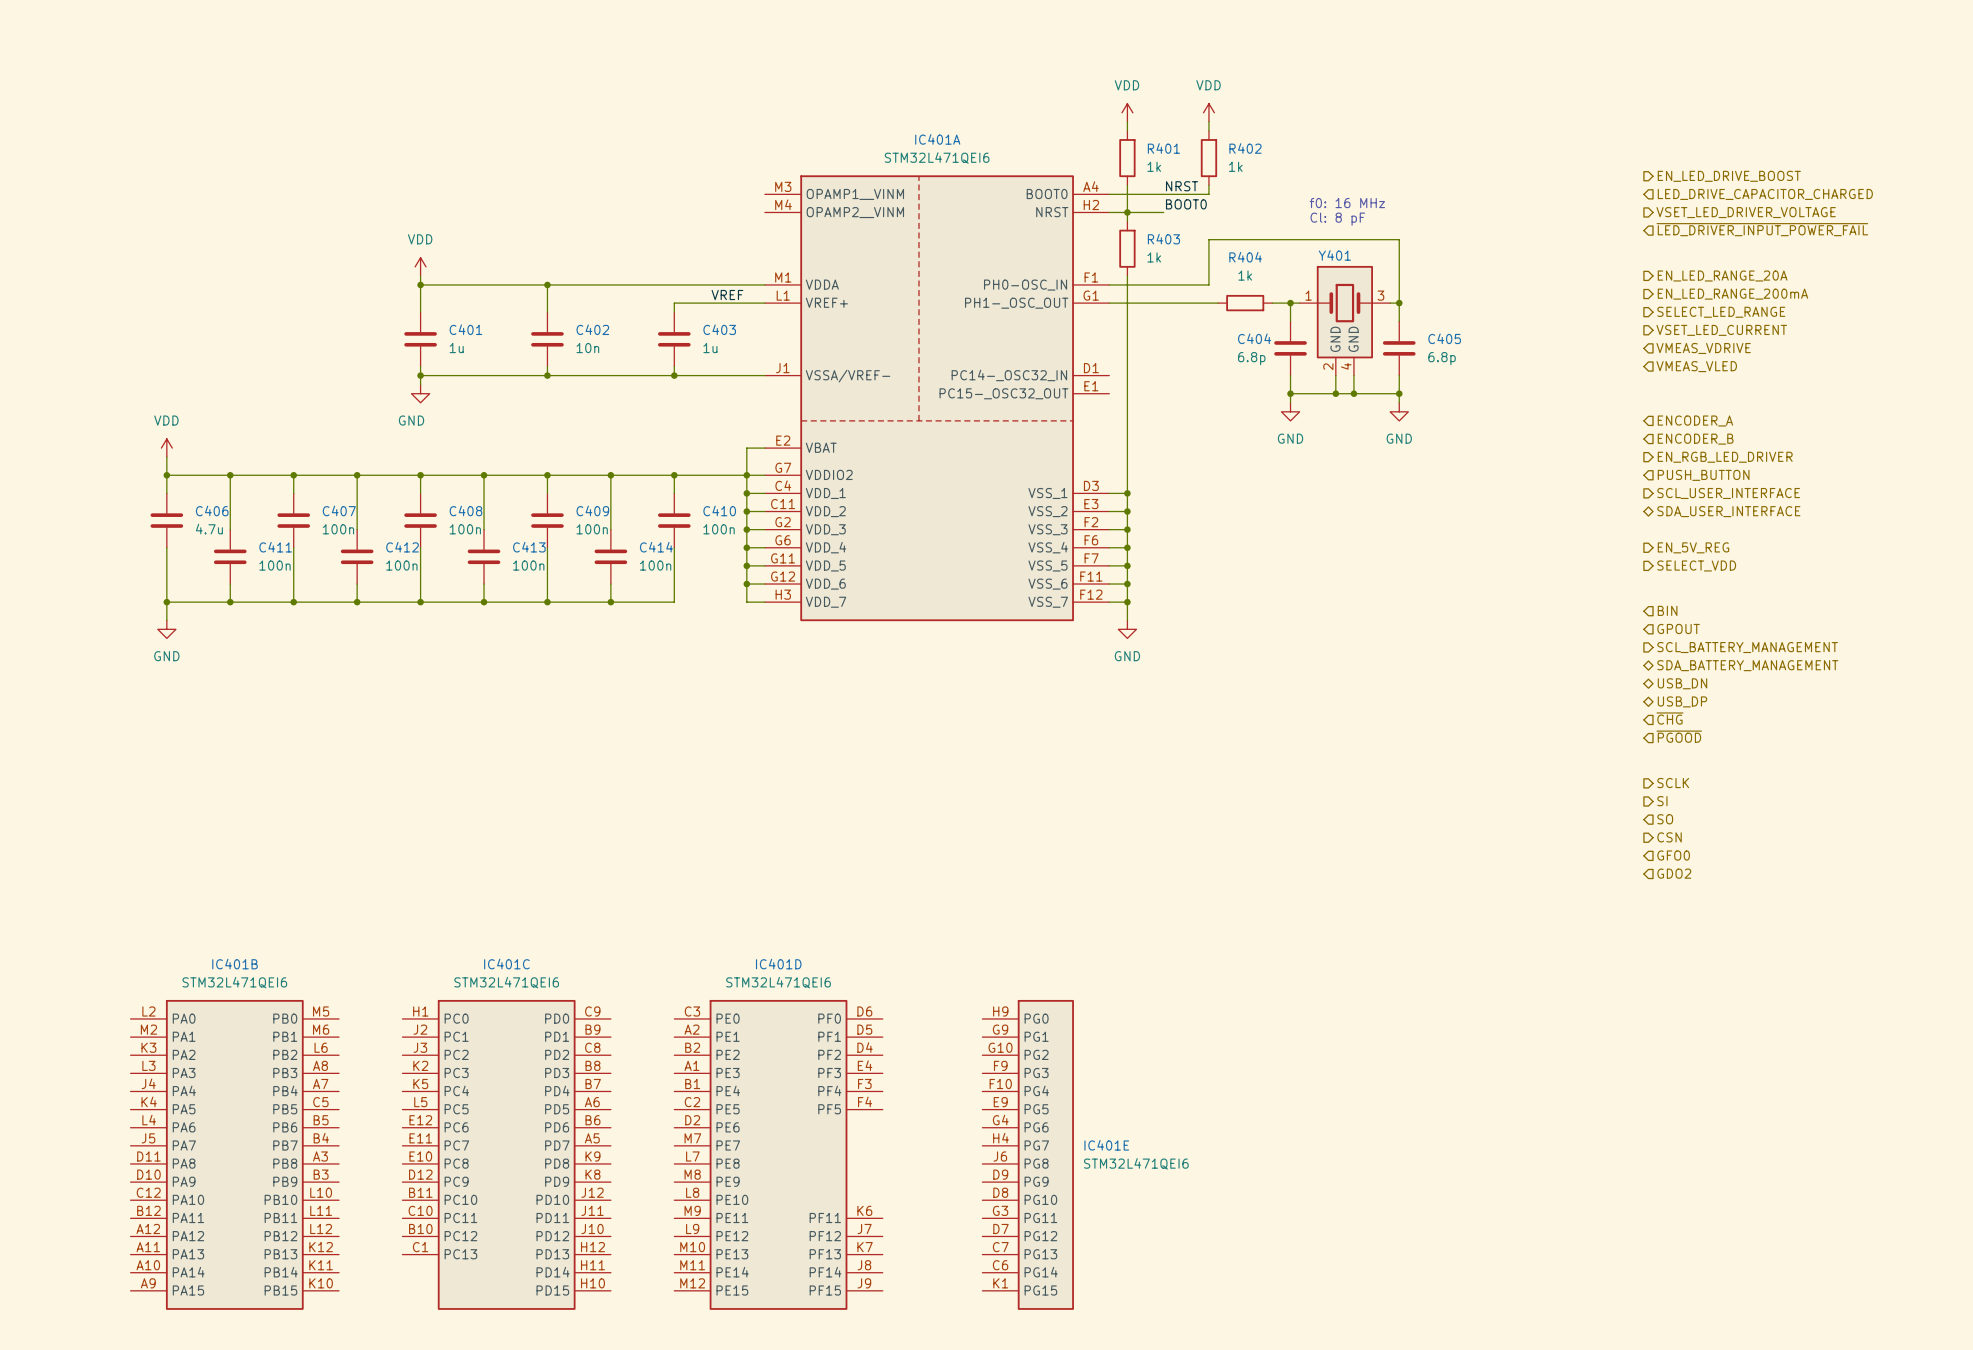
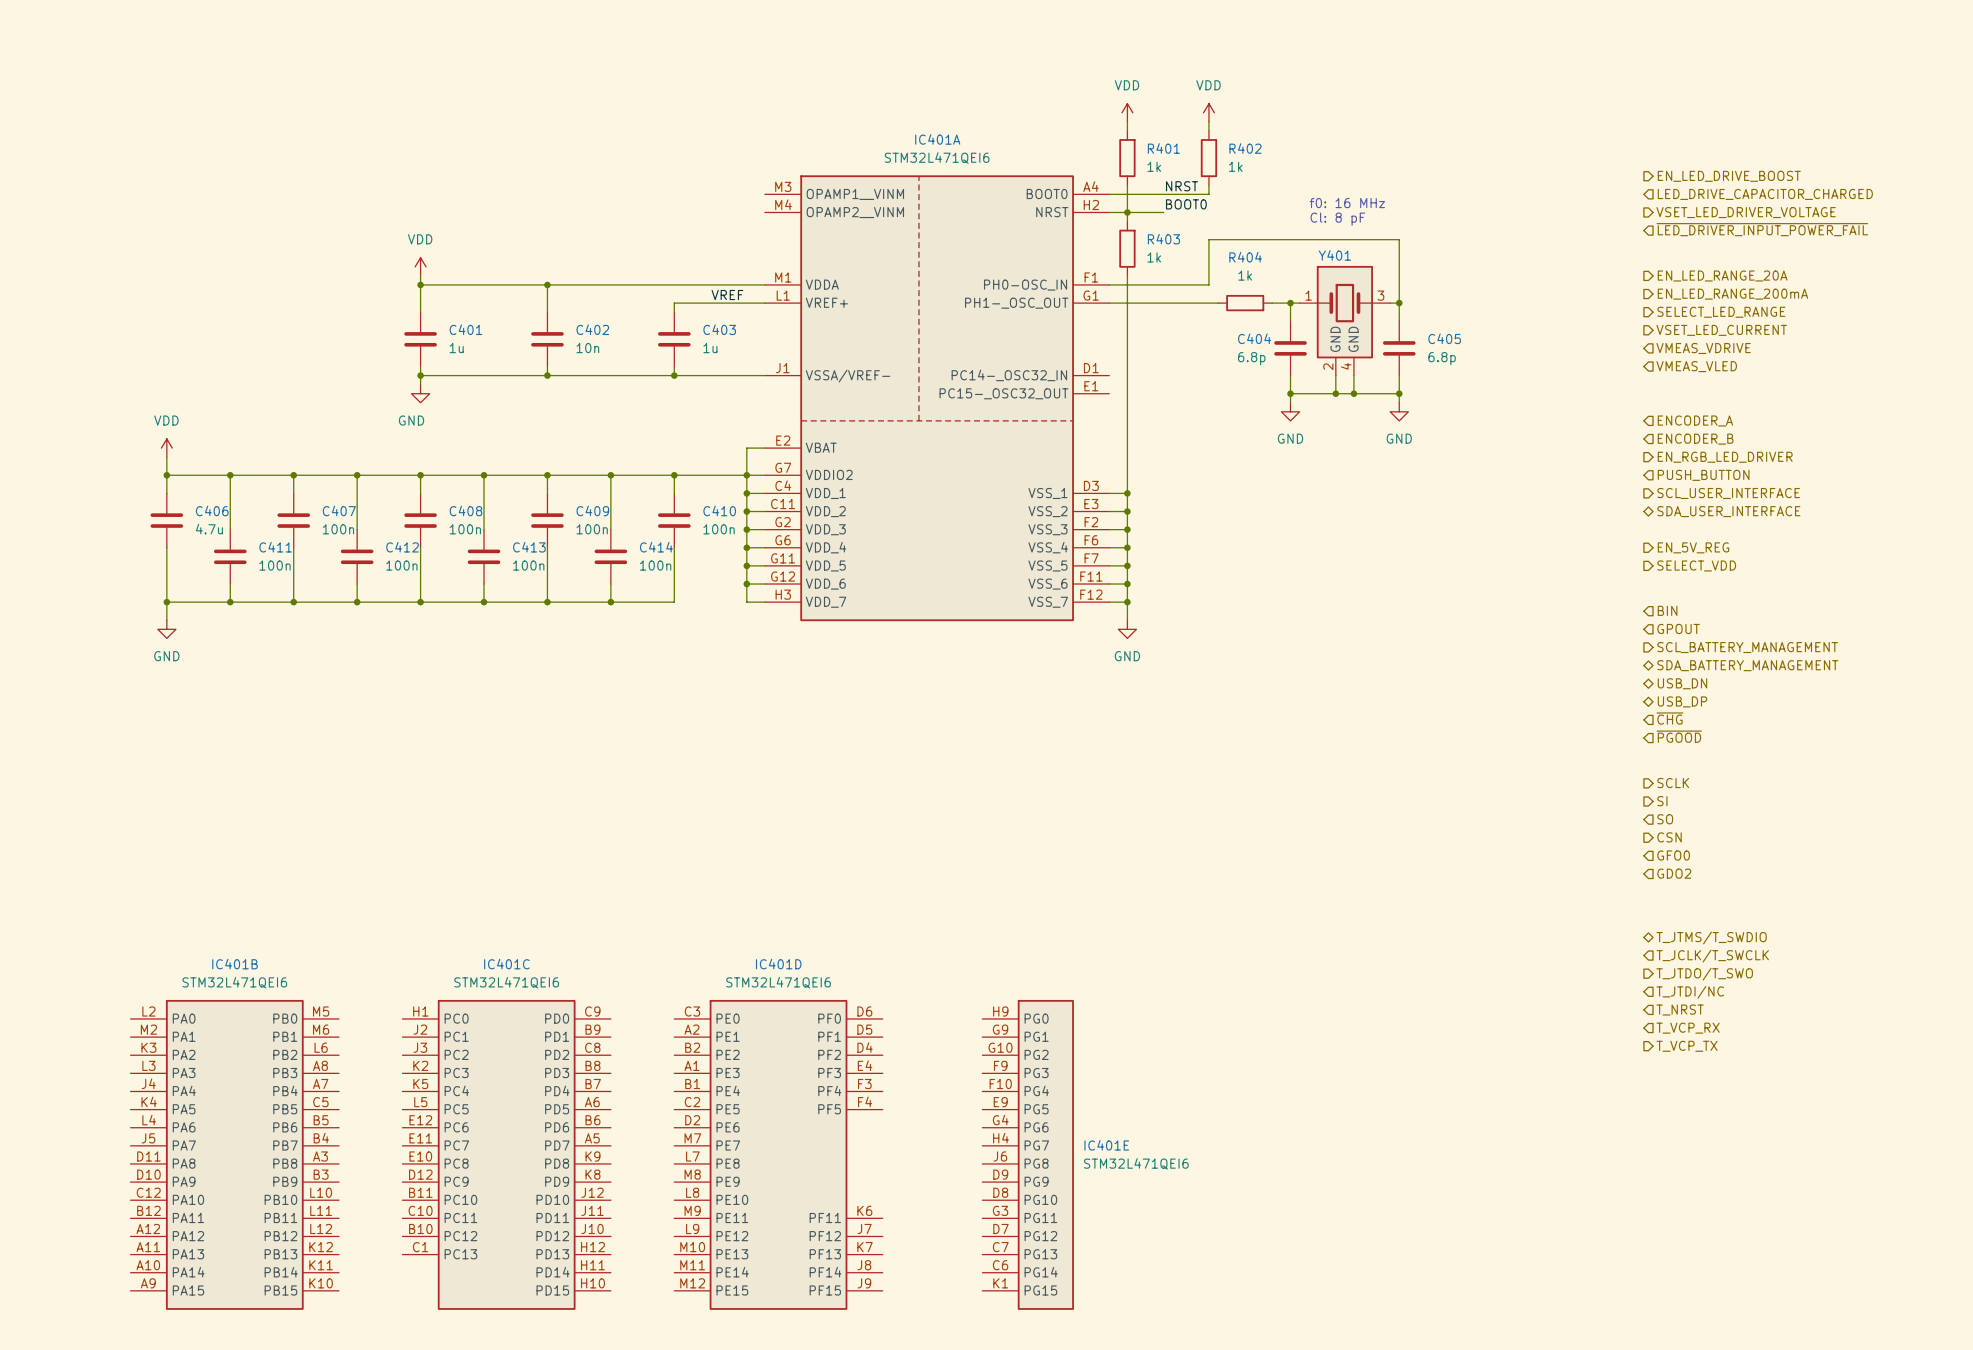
hierarchical label: none -> T_JTMS/T_SWDIO (1711, 937)
hierarchical label: none -> T_JCLK/T_SWCLK (1712, 956)
hierarchical label: none -> T_JTDO/T_SWO (1704, 974)
hierarchical label: none -> T_JTDI/NC (1690, 992)
hierarchical label: none -> T_NRST (1680, 1010)
hierarchical label: none -> T_VCP_RX (1688, 1028)
hierarchical label: none -> T_VCP_TX (1687, 1046)

